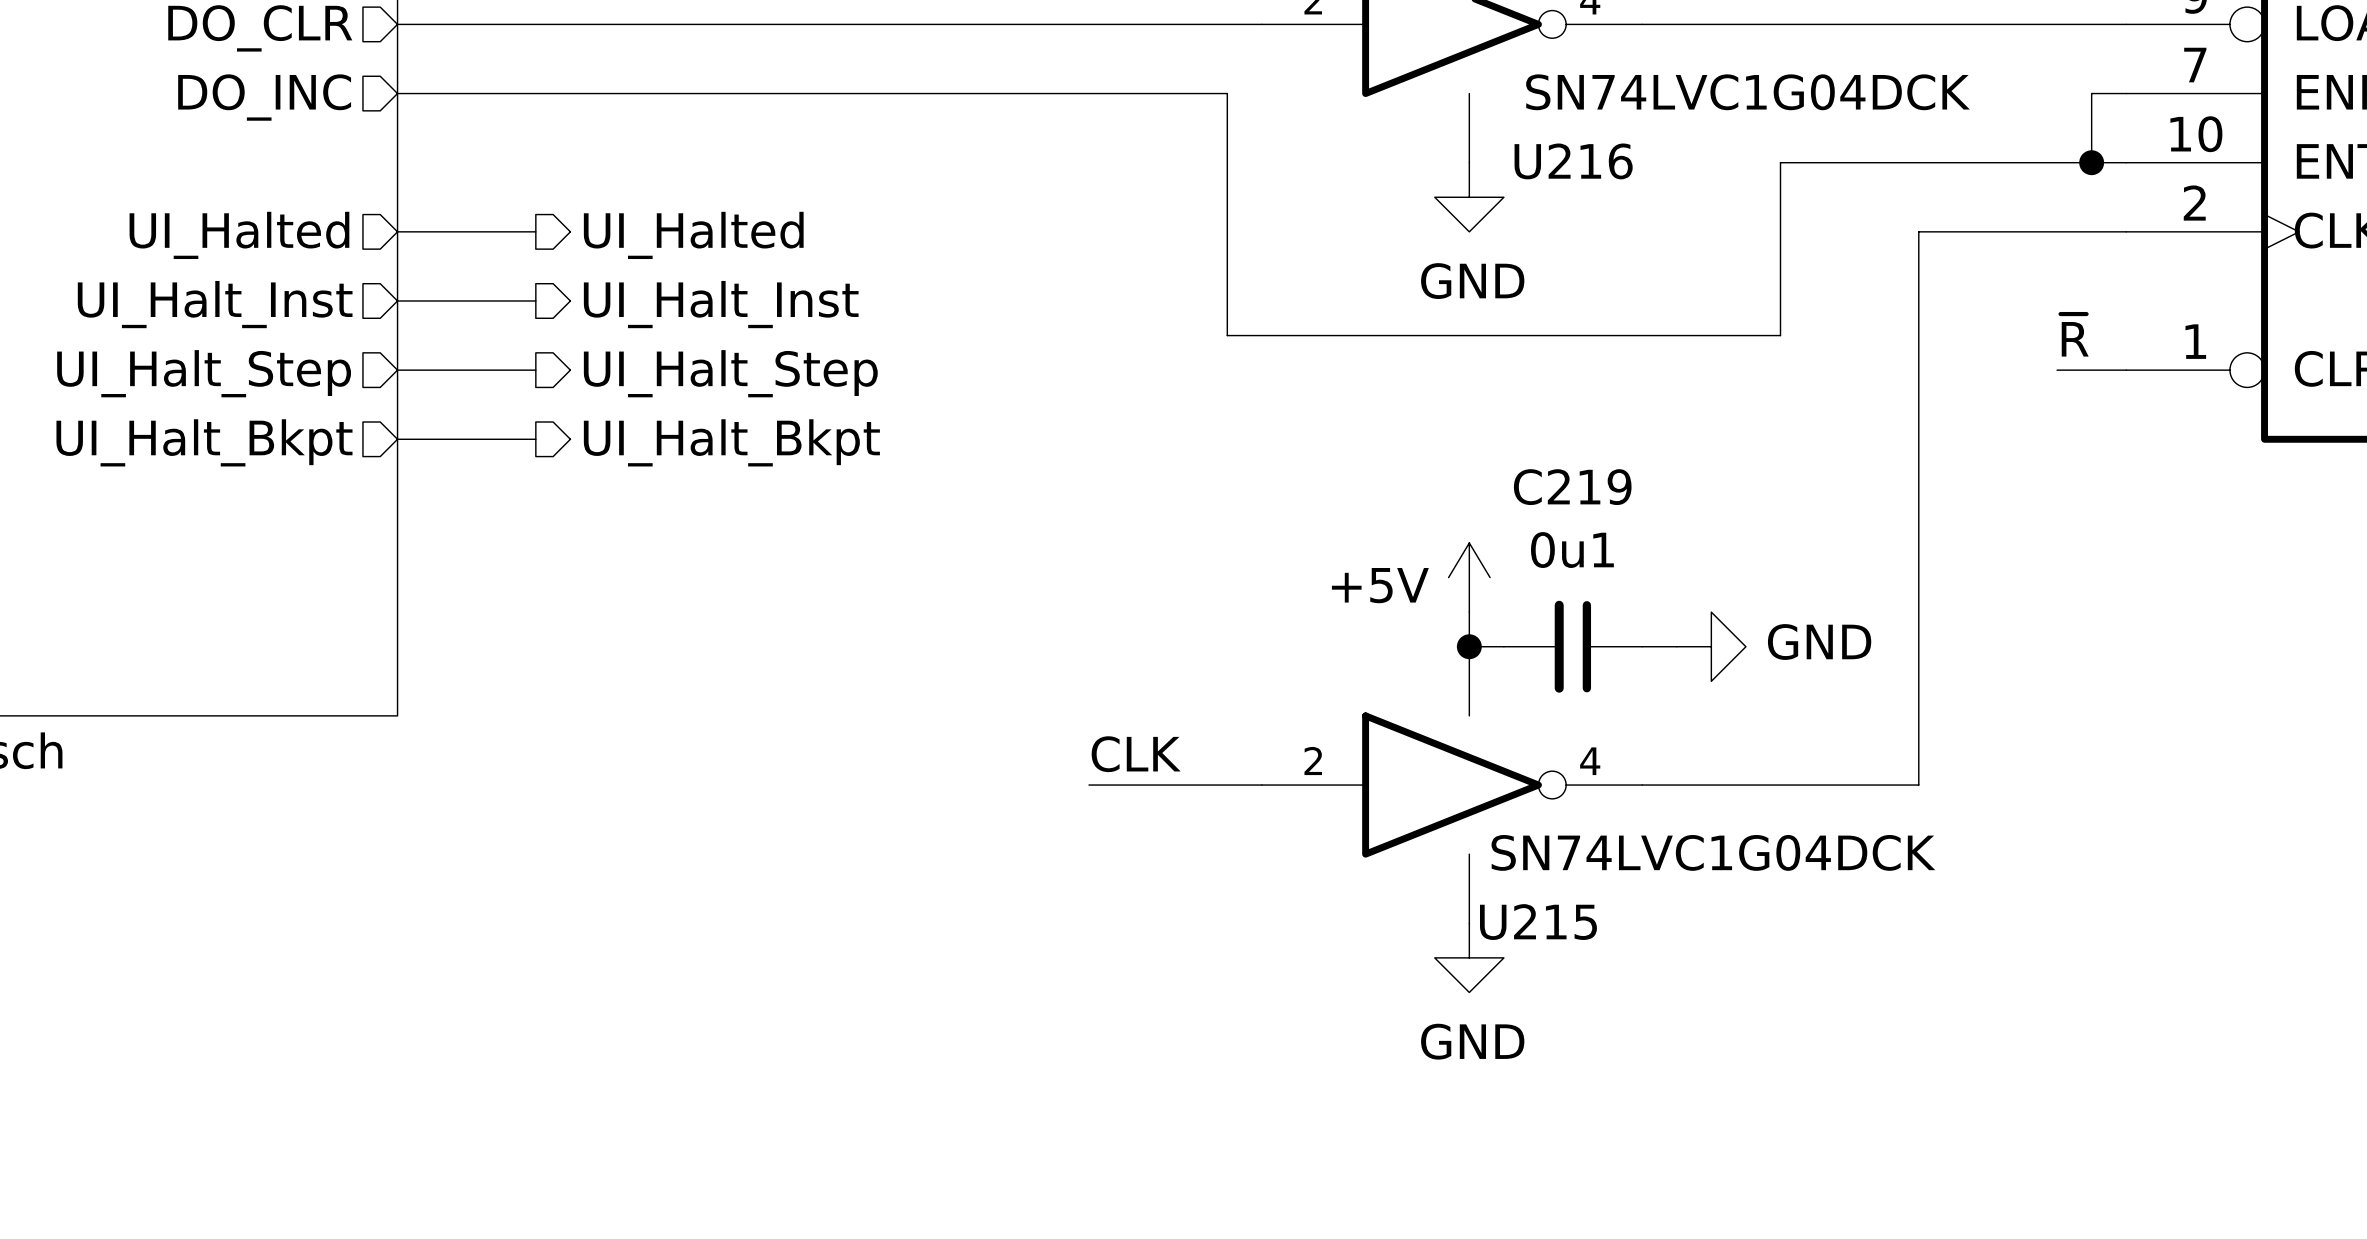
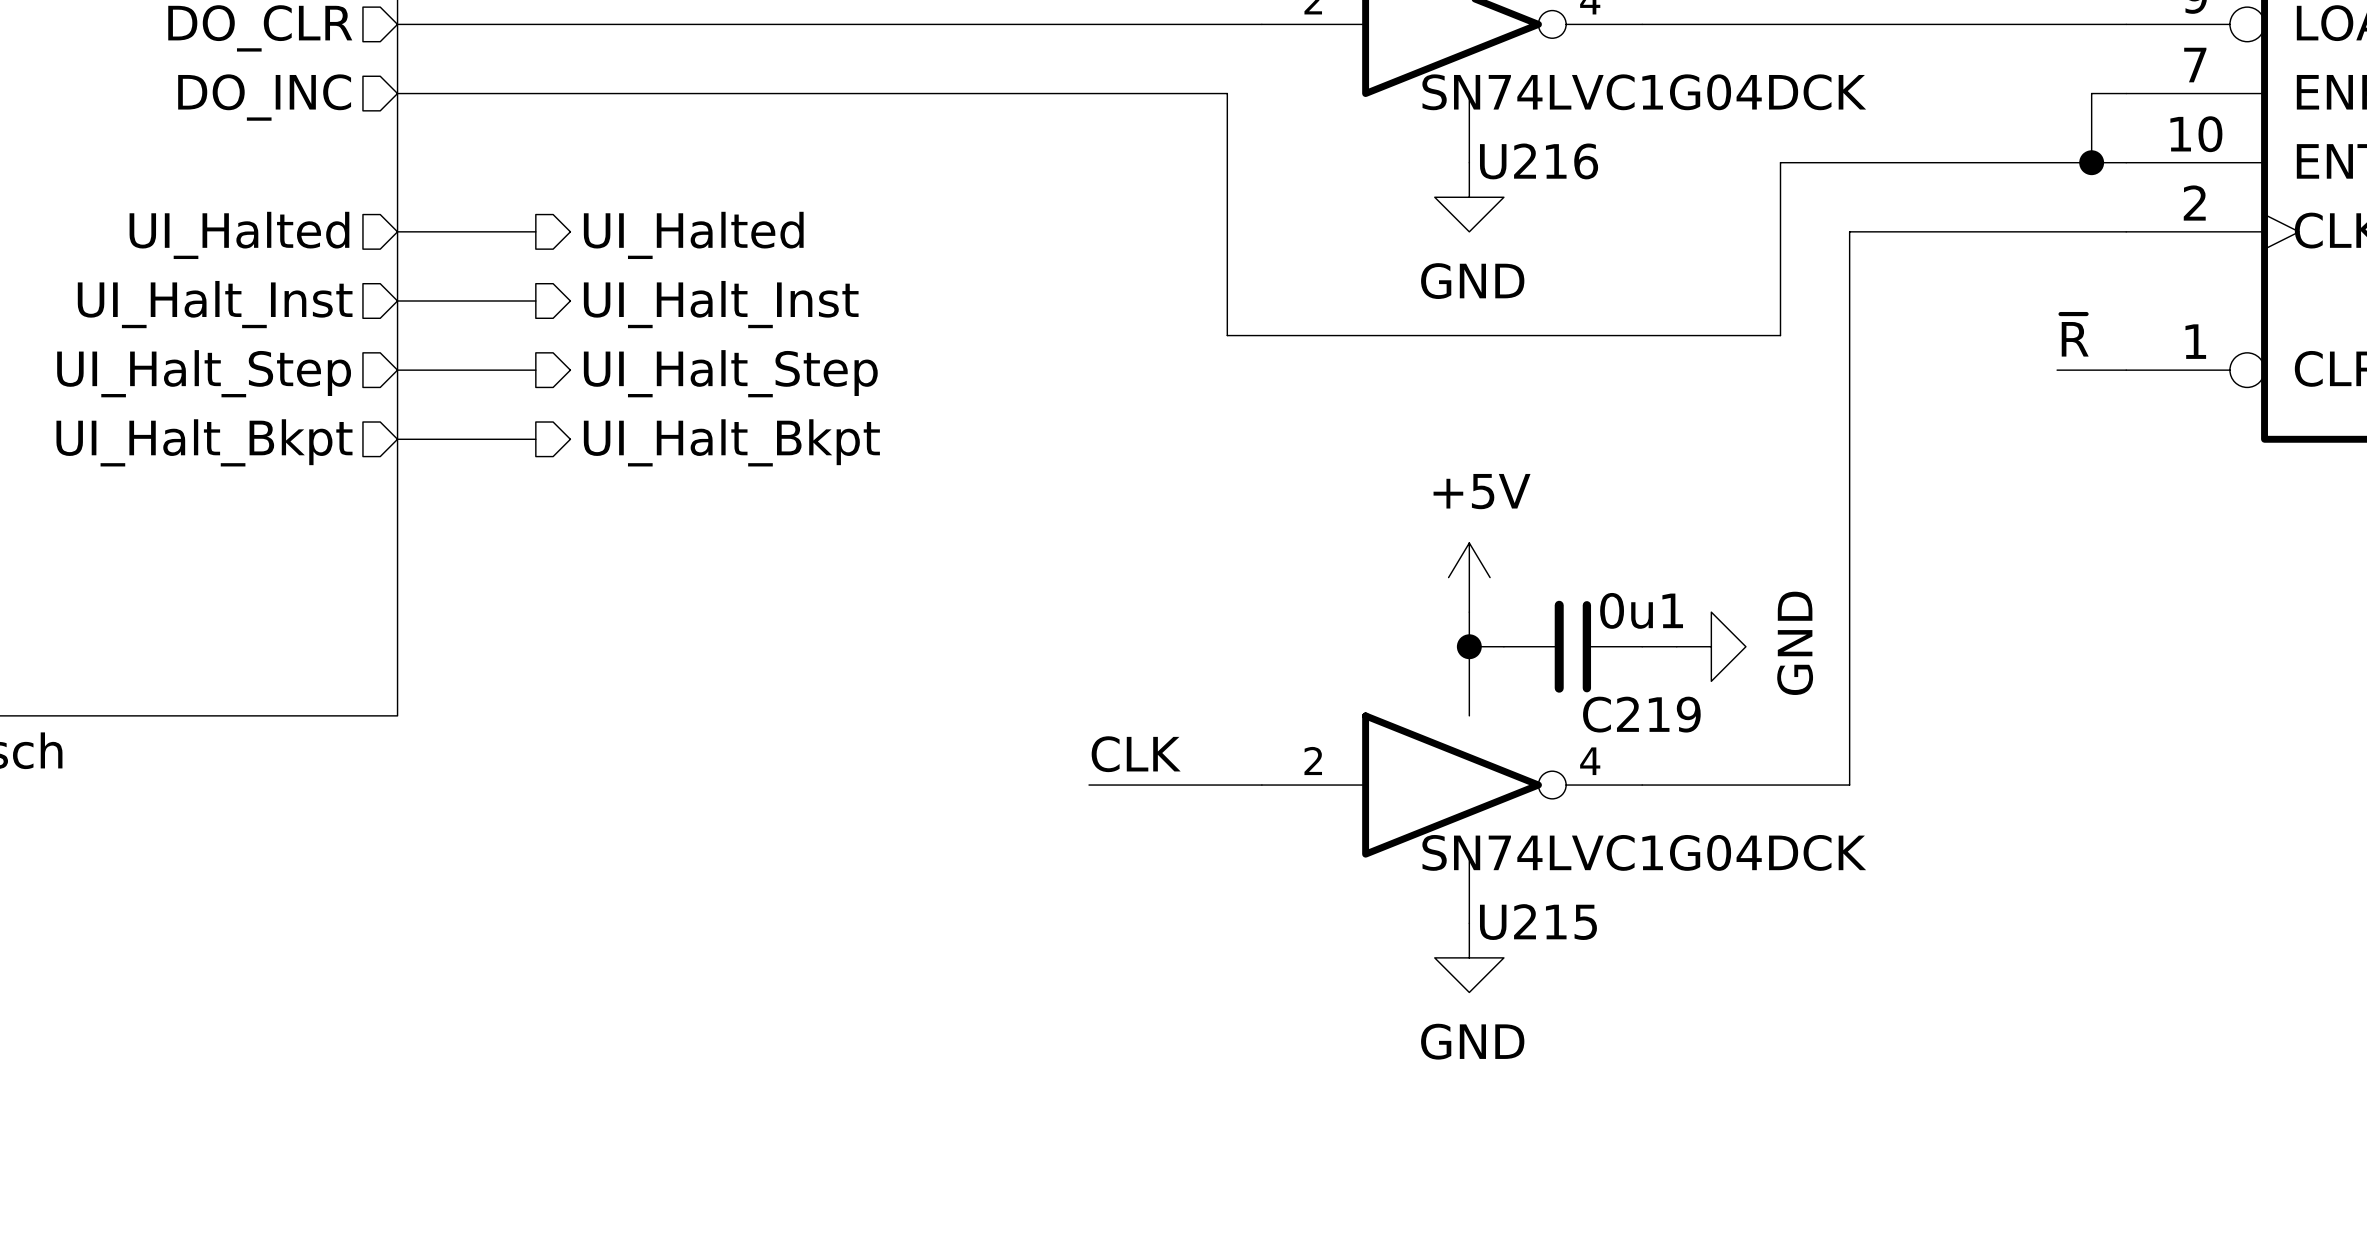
U216 value position: SN74LVC1G04DCK (1747, 92) -> SN74LVC1G04DCK (1644, 92)
U216 name position: U216 (1573, 161) -> U216 (1539, 161)
wire: (1918, 231) (1918, 785) (1849, 785) -> (1918, 231) (1849, 231) (1849, 785)
C219 name position: C219 (1572, 487) -> C219 (1641, 714)
C219 value position: 0u1 (1572, 550) -> 0u1 (1641, 610)
power symbol text position: +5V (1380, 585) -> +5V (1482, 491)
power symbol text rotation: 0° (1819, 642) -> 90° counterclockwise (1795, 643)
U215 value position: SN74LVC1G04DCK (1713, 852) -> SN74LVC1G04DCK (1644, 852)

